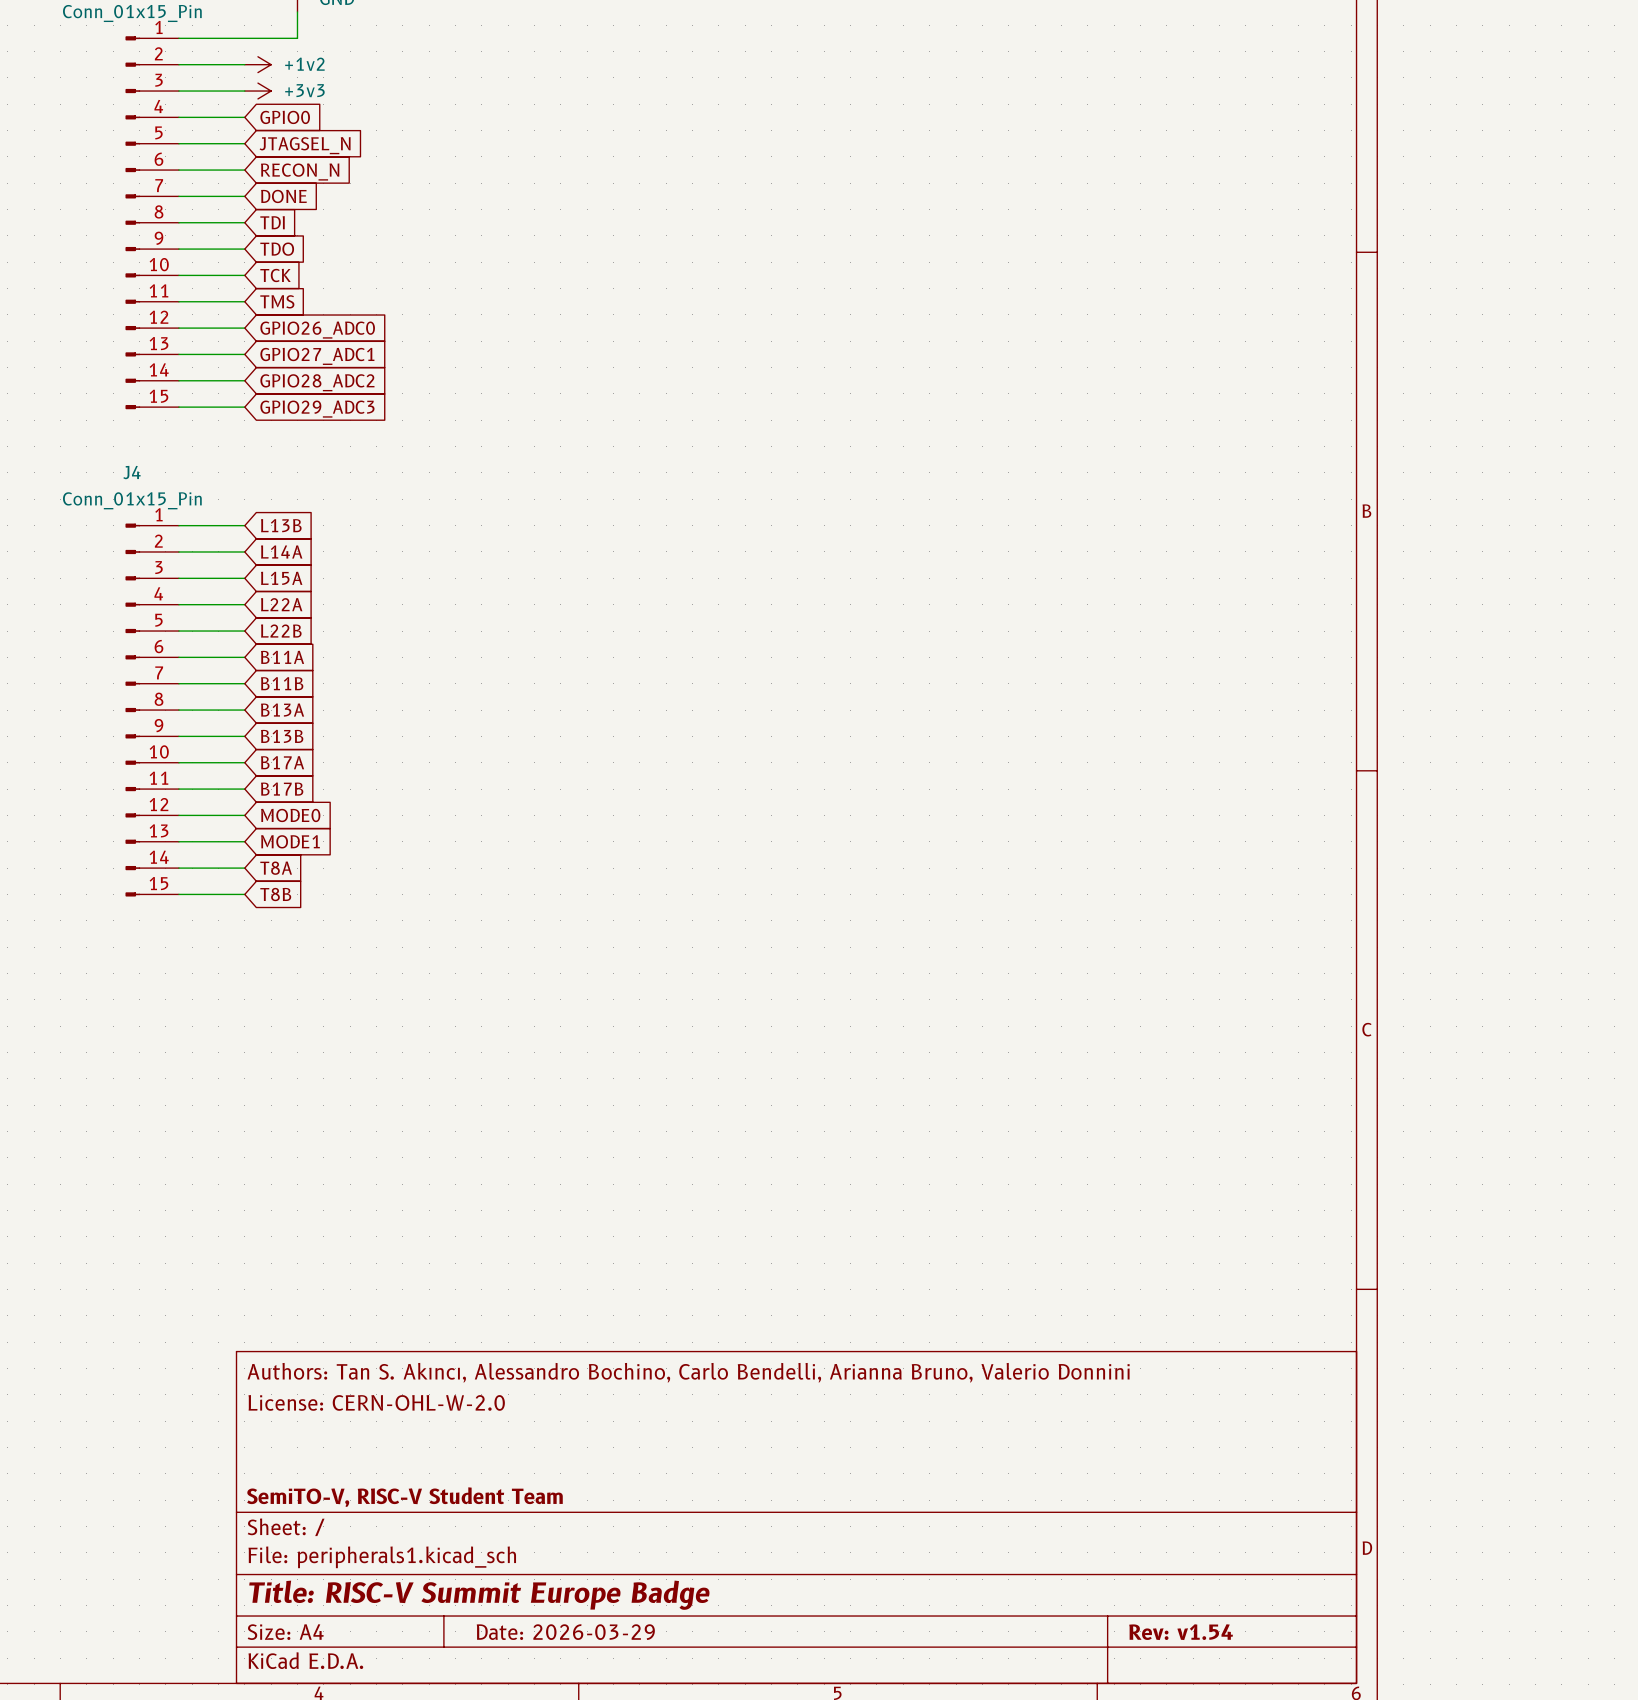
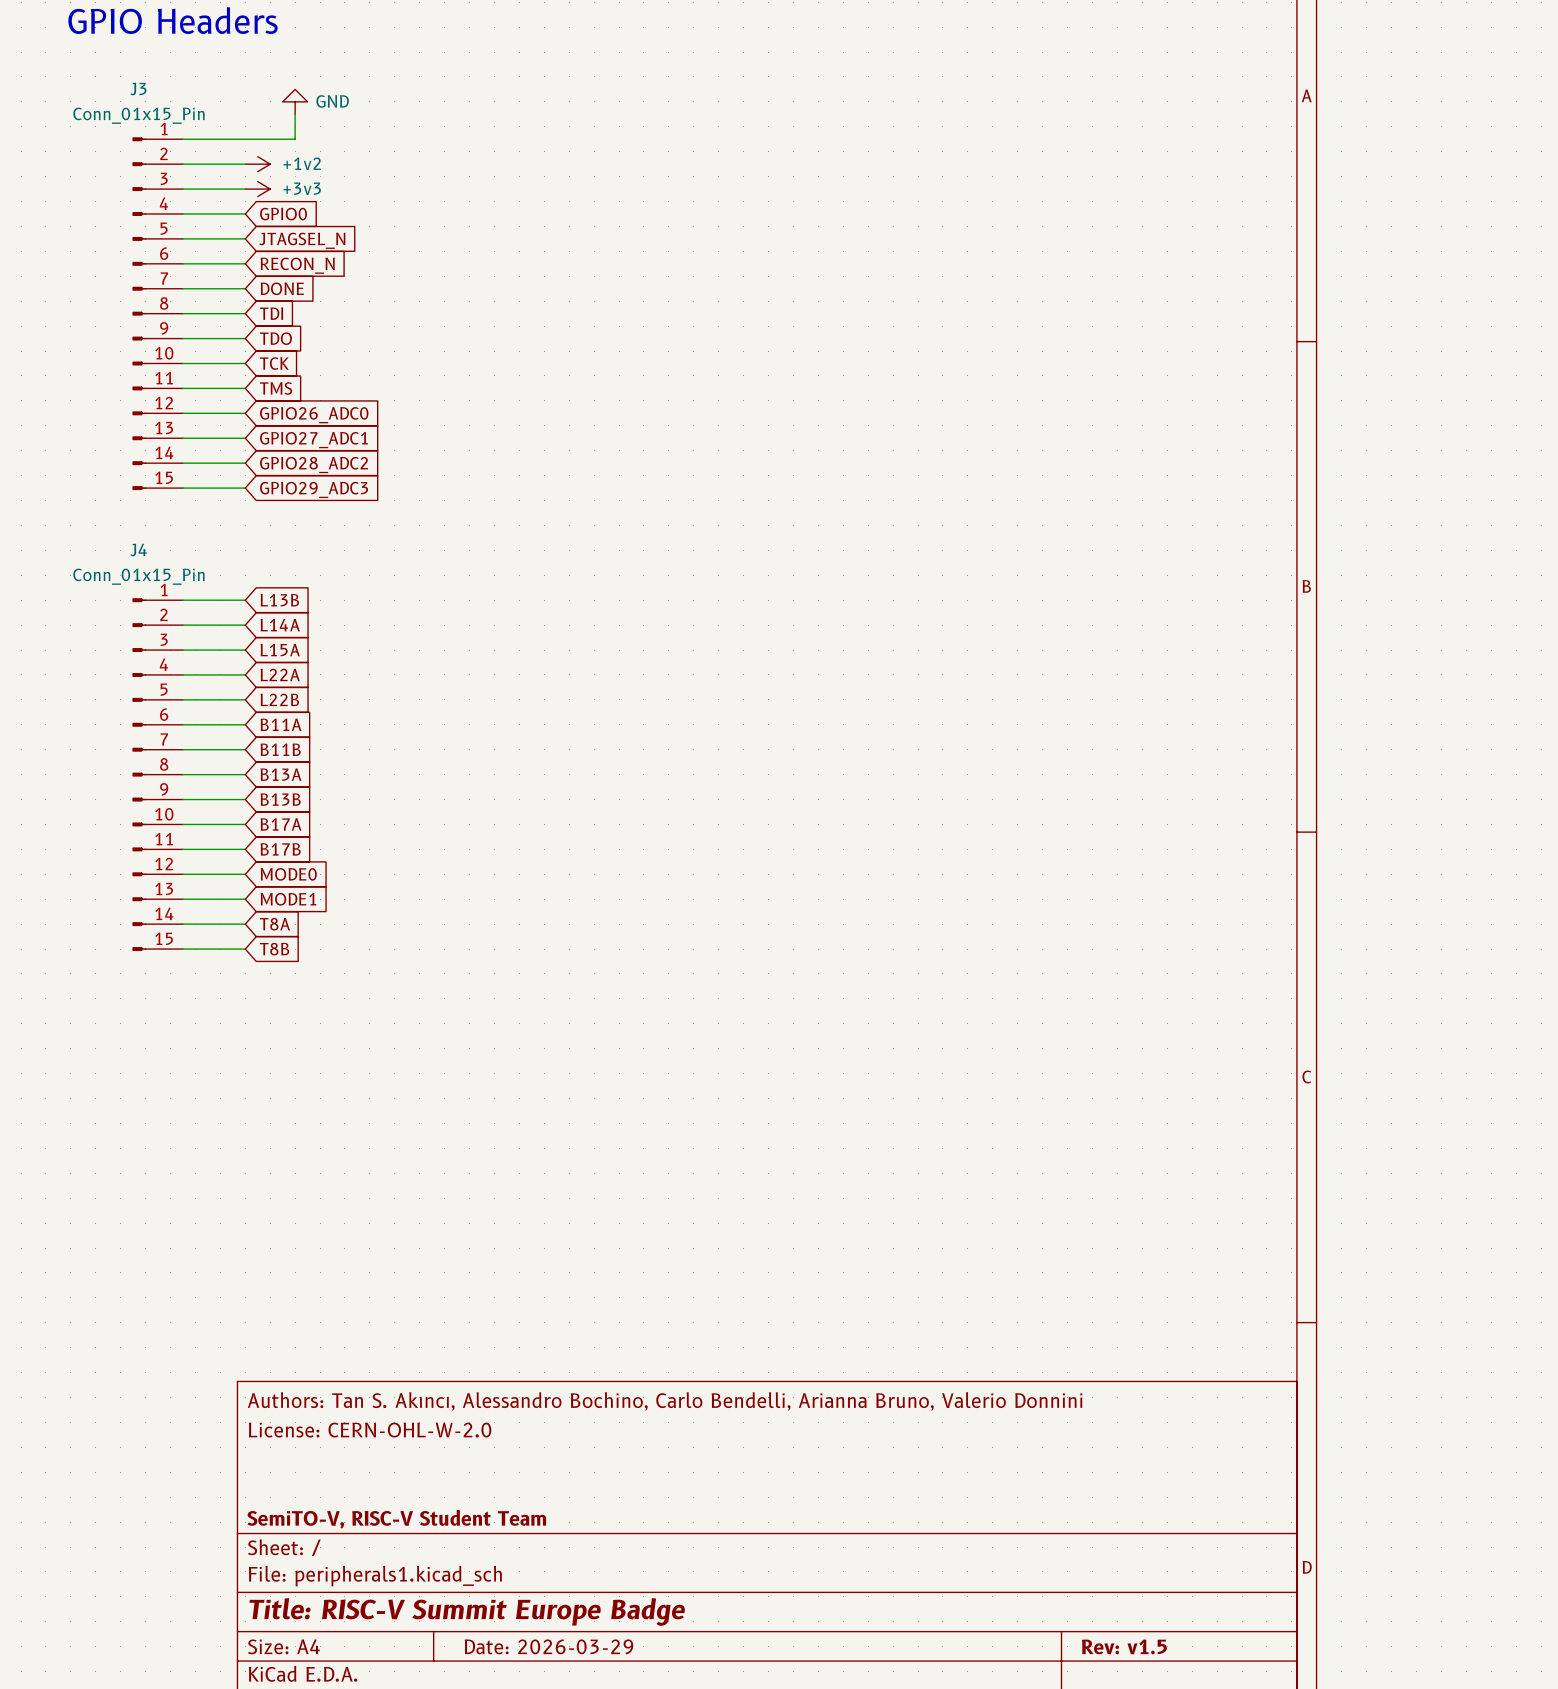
title block: Rev: v1.54 (1181, 1632) -> Rev: v1.5 (1124, 1646)

